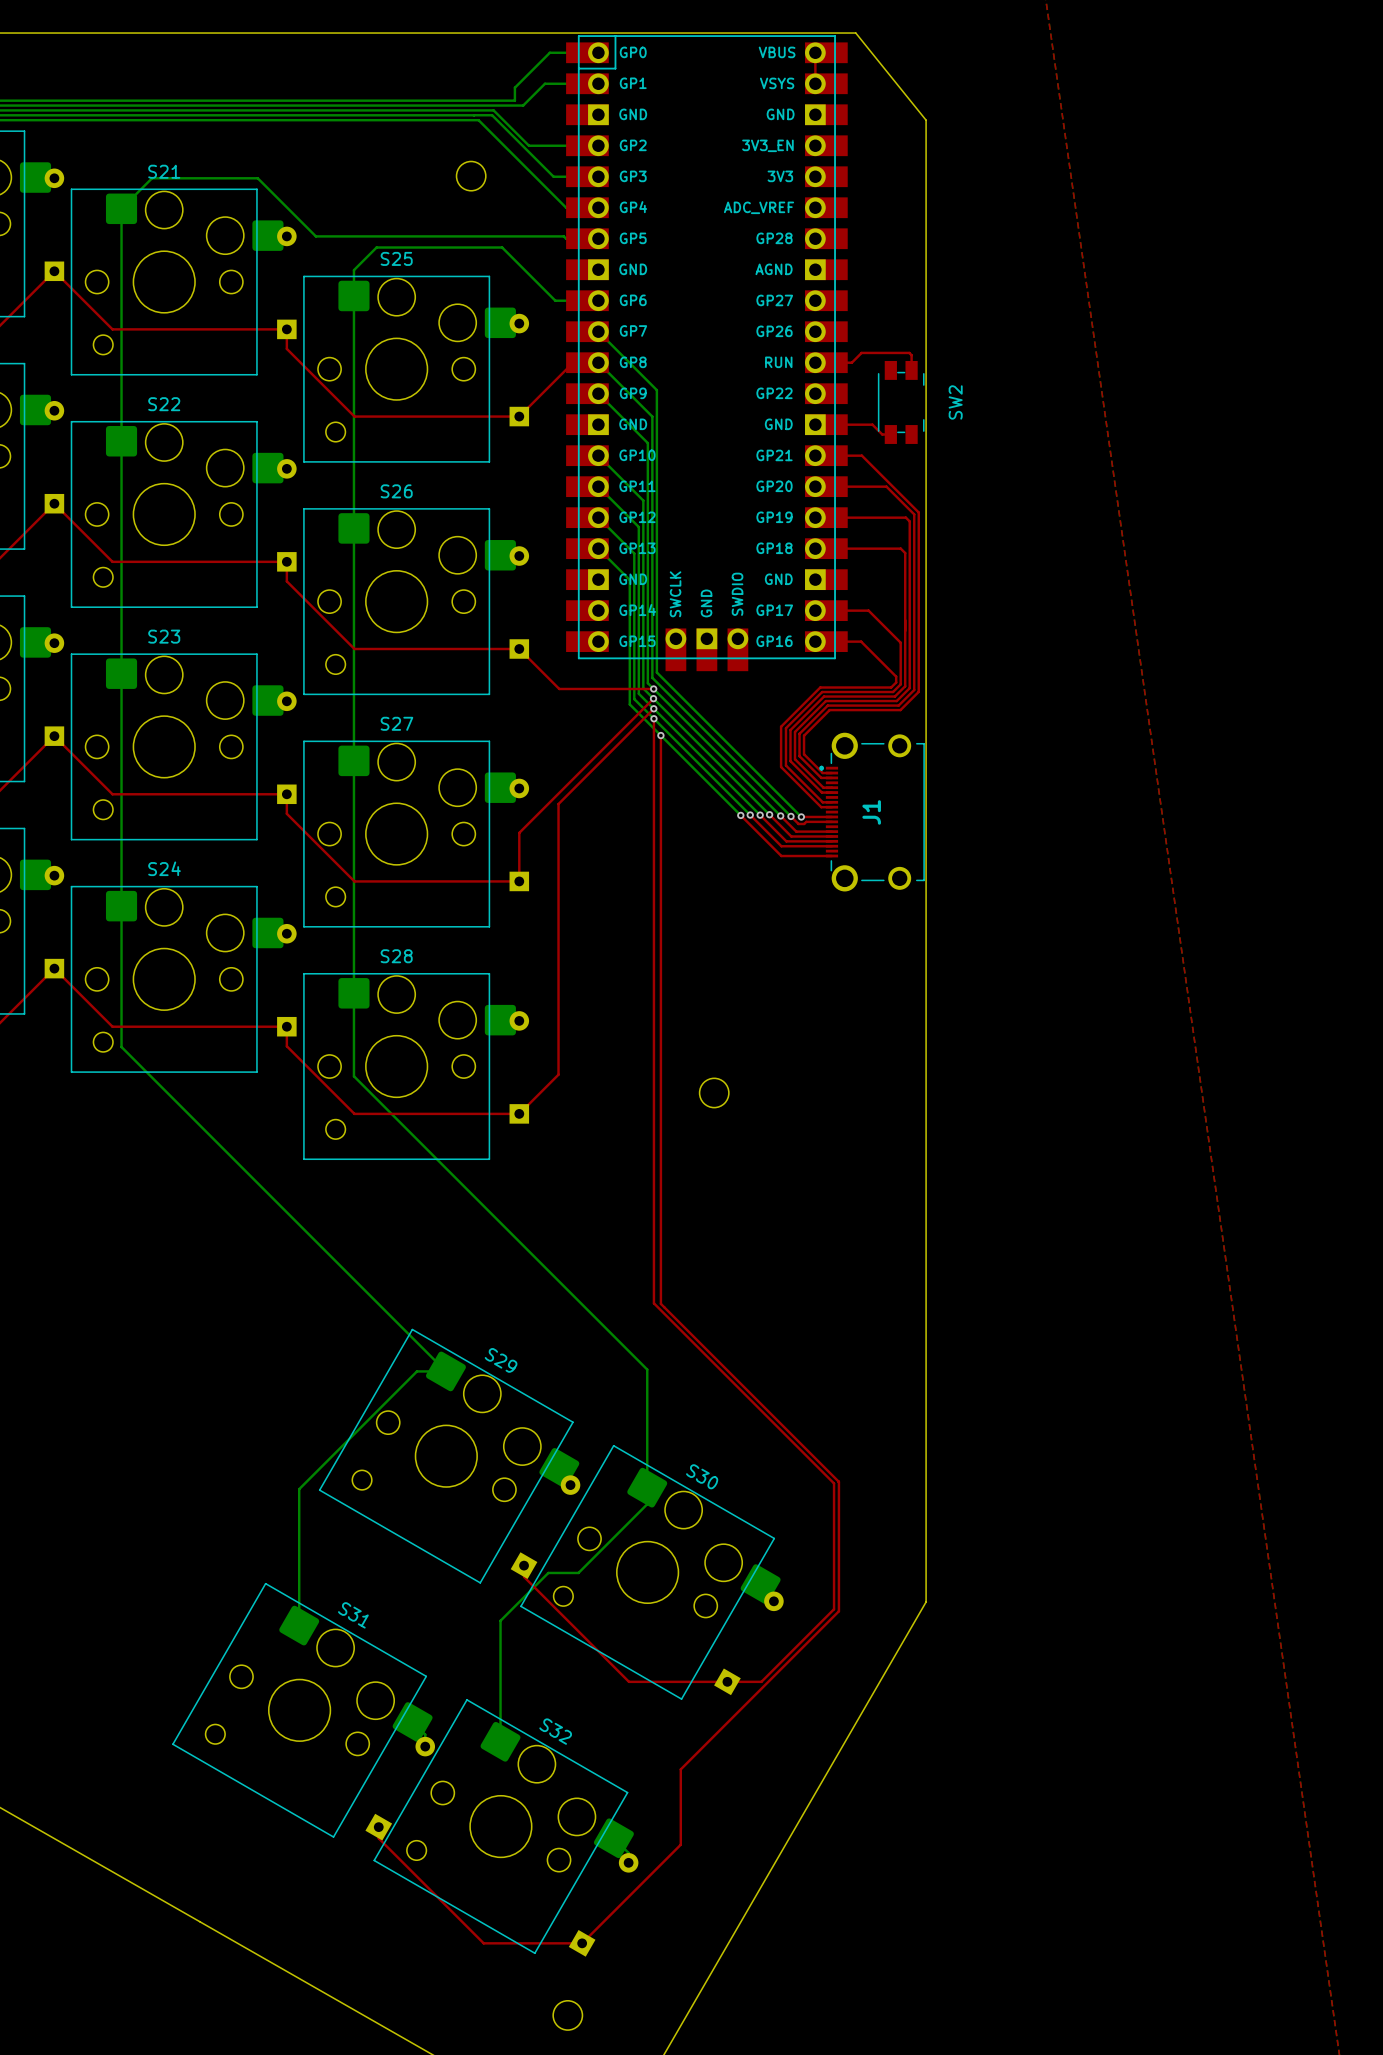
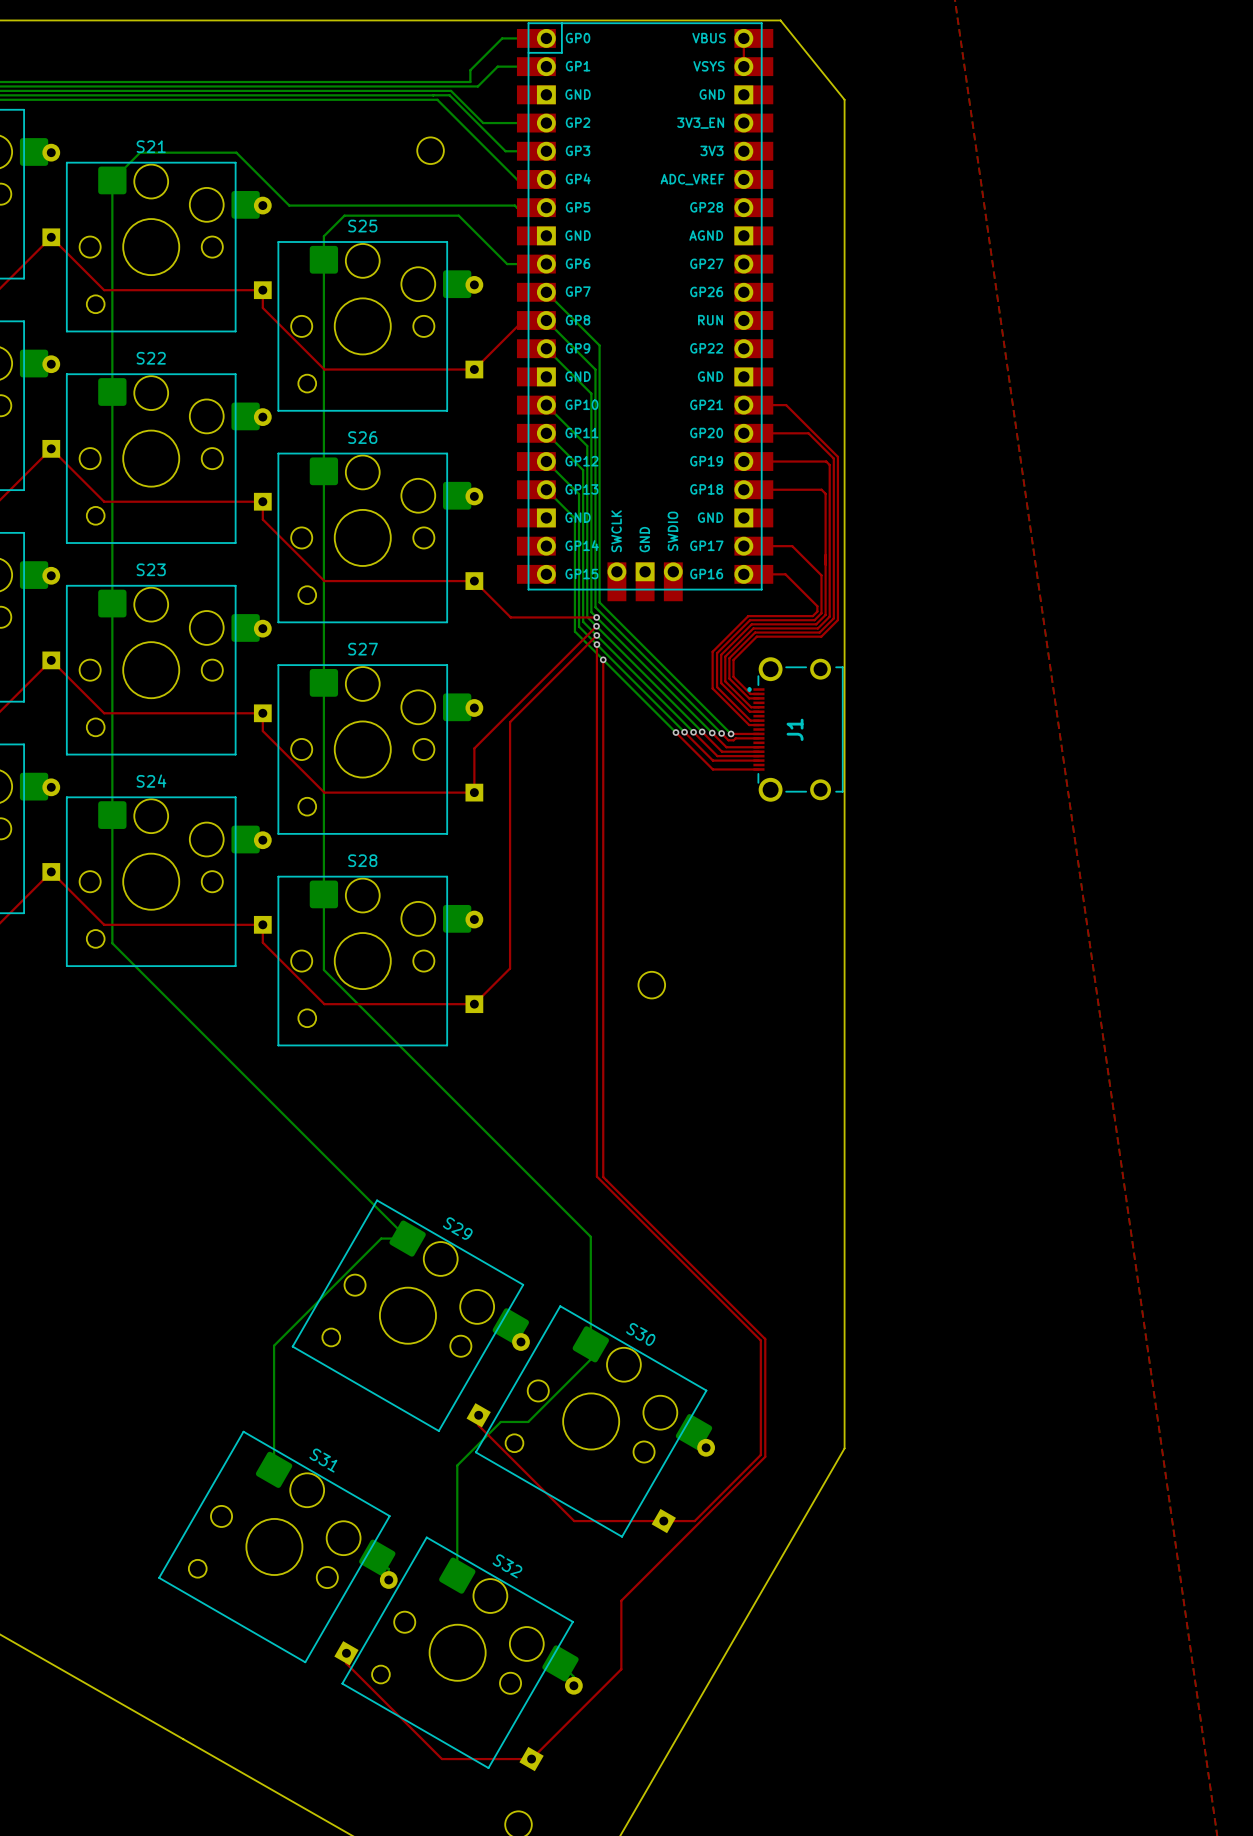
top track: (820, 357) (815, 362) (851, 362) (861, 352) (909, 352) (911, 355) (911, 370) -> none
SW2: (901, 402) -> none
top track: (815, 424) (872, 424) (882, 434) (890, 434) -> none

